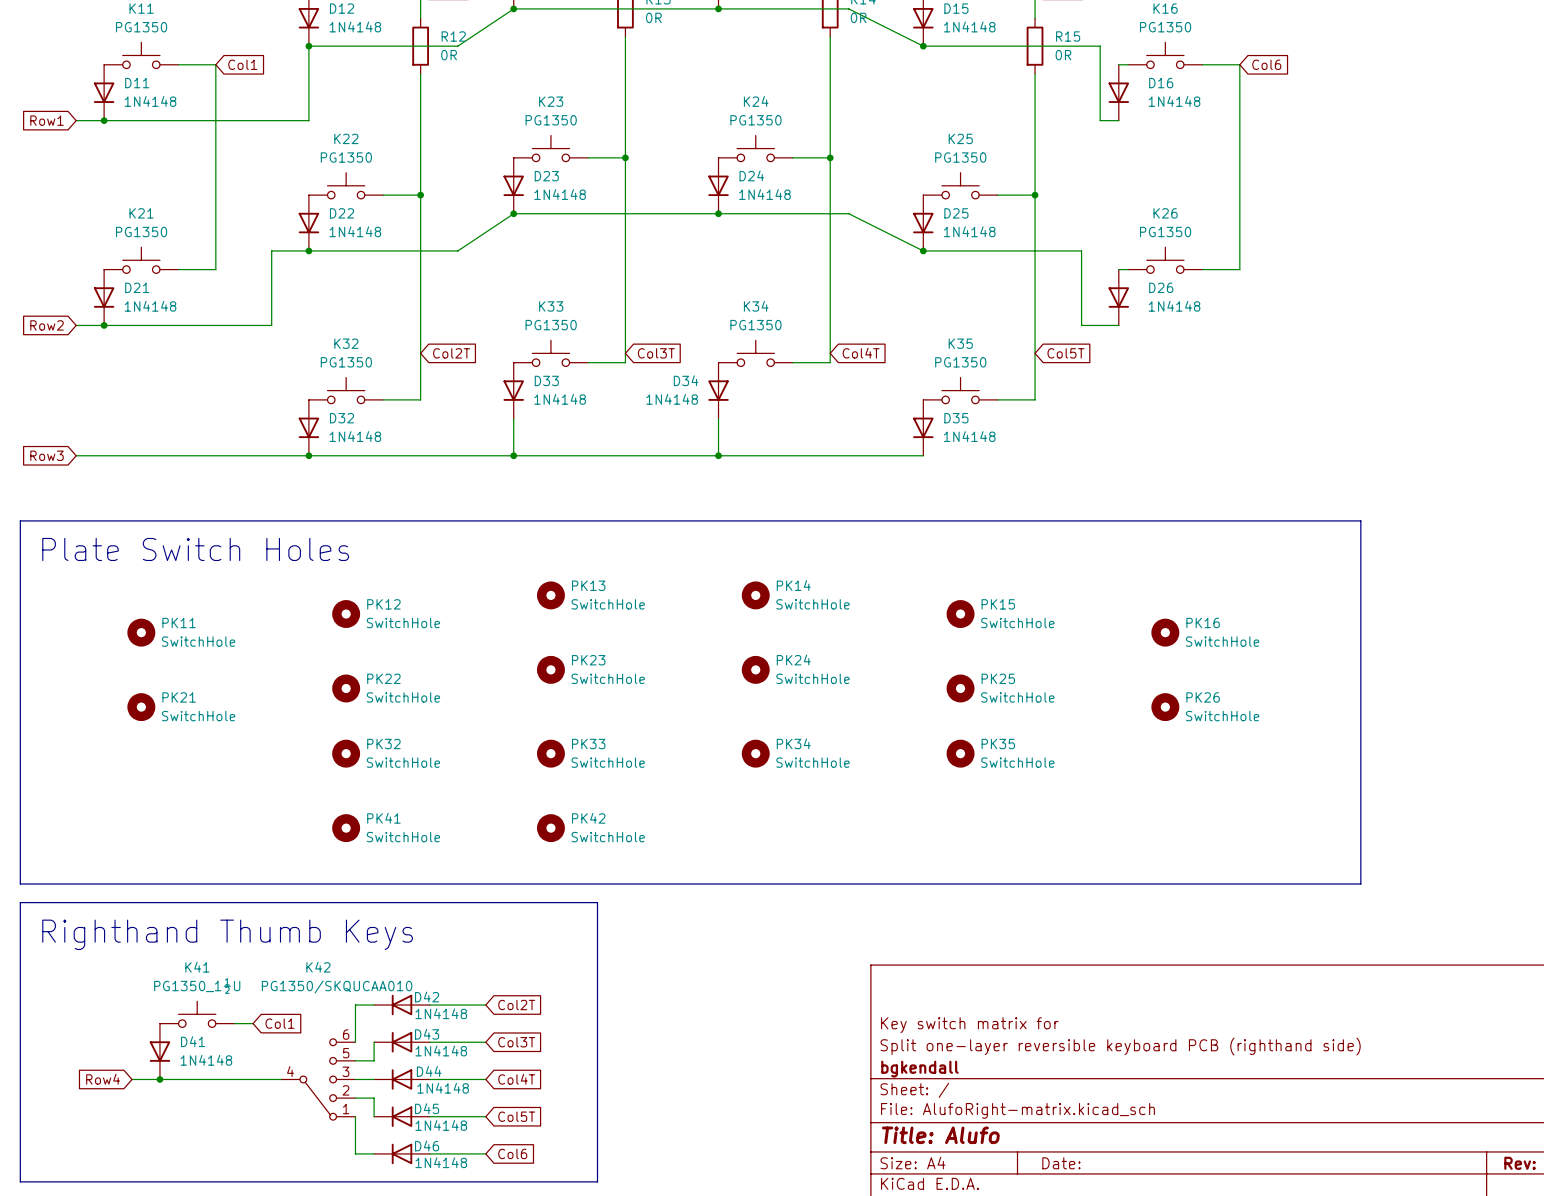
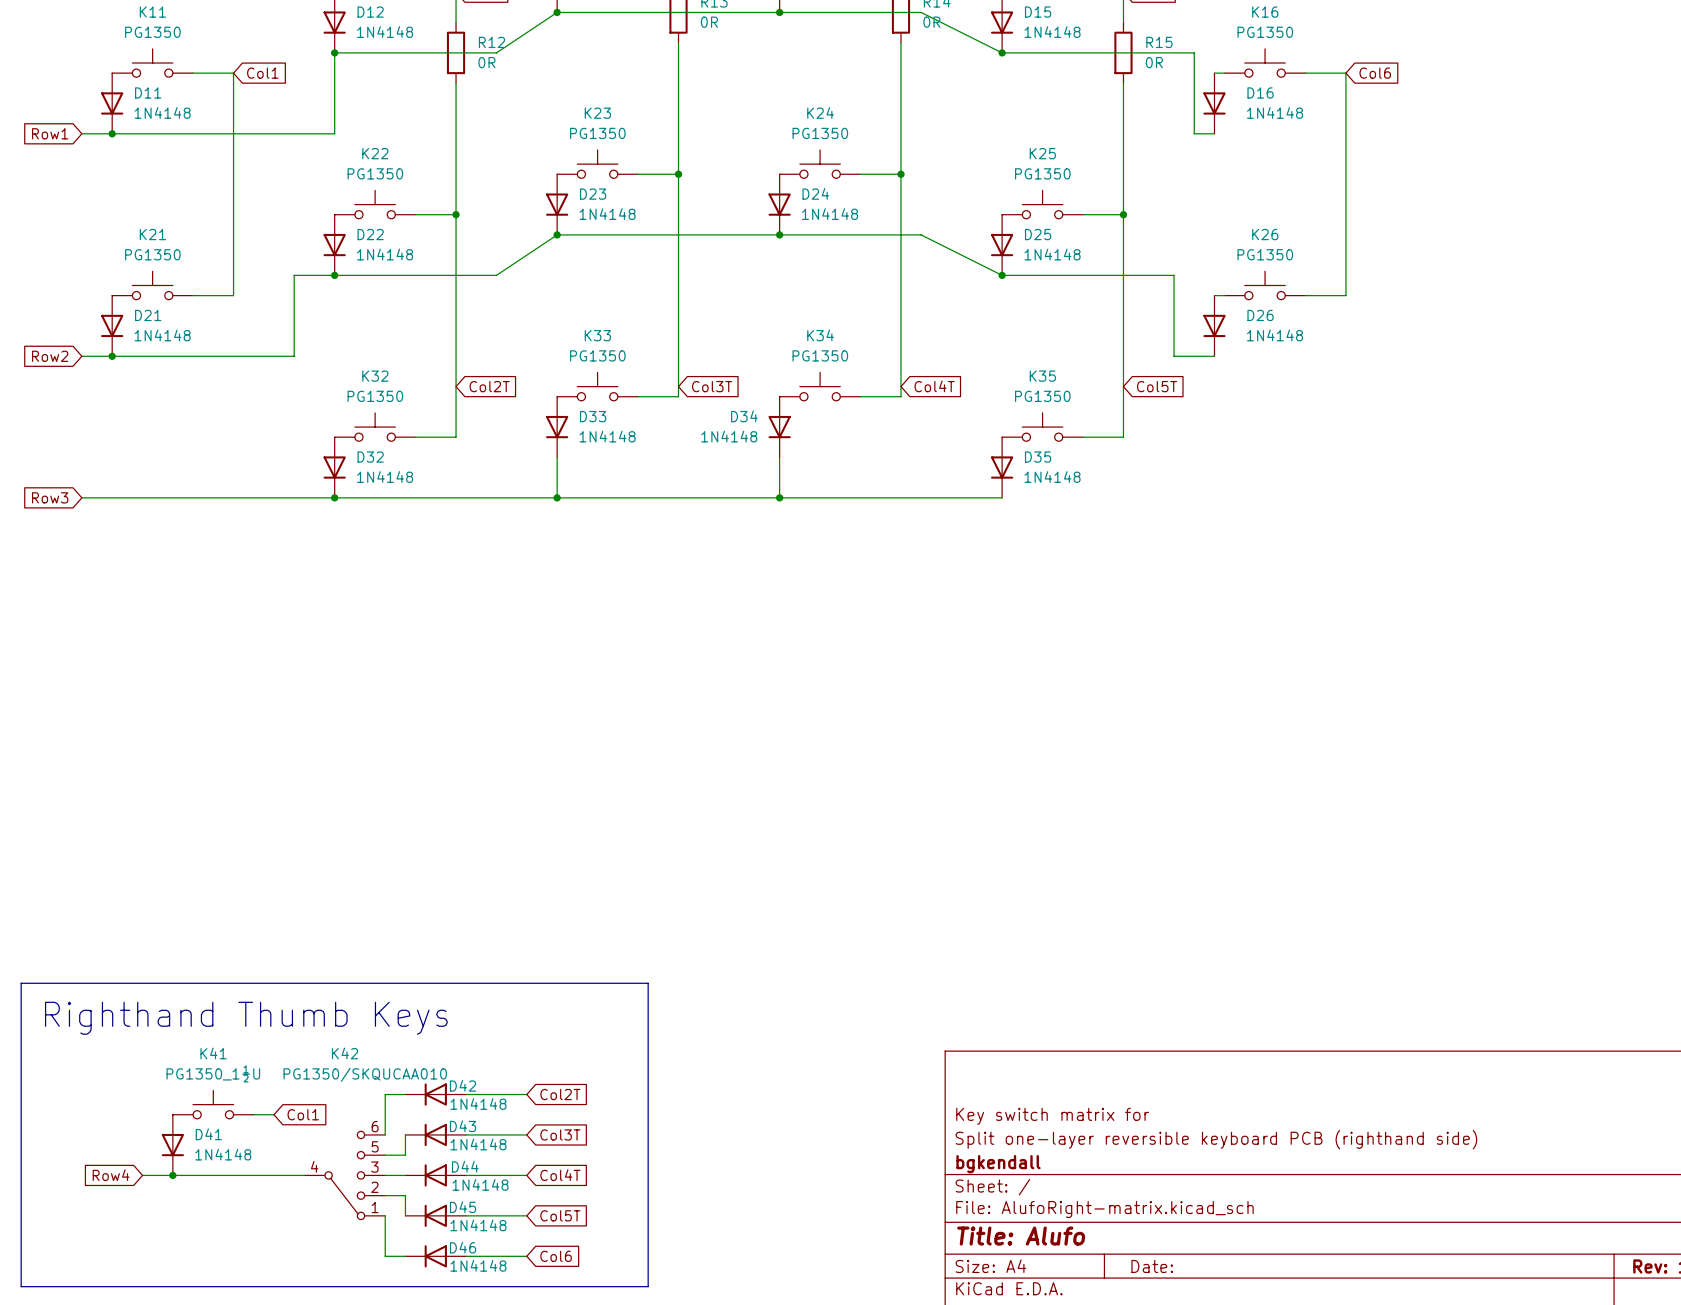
line: (20, 520) (1360, 520) (1360, 883) (20, 883) (20, 520) -> none
text: Plate Switch Holes (195, 549) -> none
PK13: SwitchHole (550, 595) -> none
PK14: SwitchHole (755, 595) -> none
PK12: SwitchHole (346, 614) -> none
PK15: SwitchHole (960, 614) -> none
PK11: SwitchHole (141, 632) -> none
PK16: SwitchHole (1165, 632) -> none
PK23: SwitchHole (550, 669) -> none
PK24: SwitchHole (755, 669) -> none
PK22: SwitchHole (346, 688) -> none
PK25: SwitchHole (960, 688) -> none
PK21: SwitchHole (141, 707) -> none
PK26: SwitchHole (1165, 707) -> none
PK32: SwitchHole (346, 753) -> none
PK33: SwitchHole (550, 753) -> none
PK34: SwitchHole (755, 753) -> none
PK35: SwitchHole (960, 753) -> none
PK41: SwitchHole (346, 828) -> none
PK42: SwitchHole (550, 828) -> none

